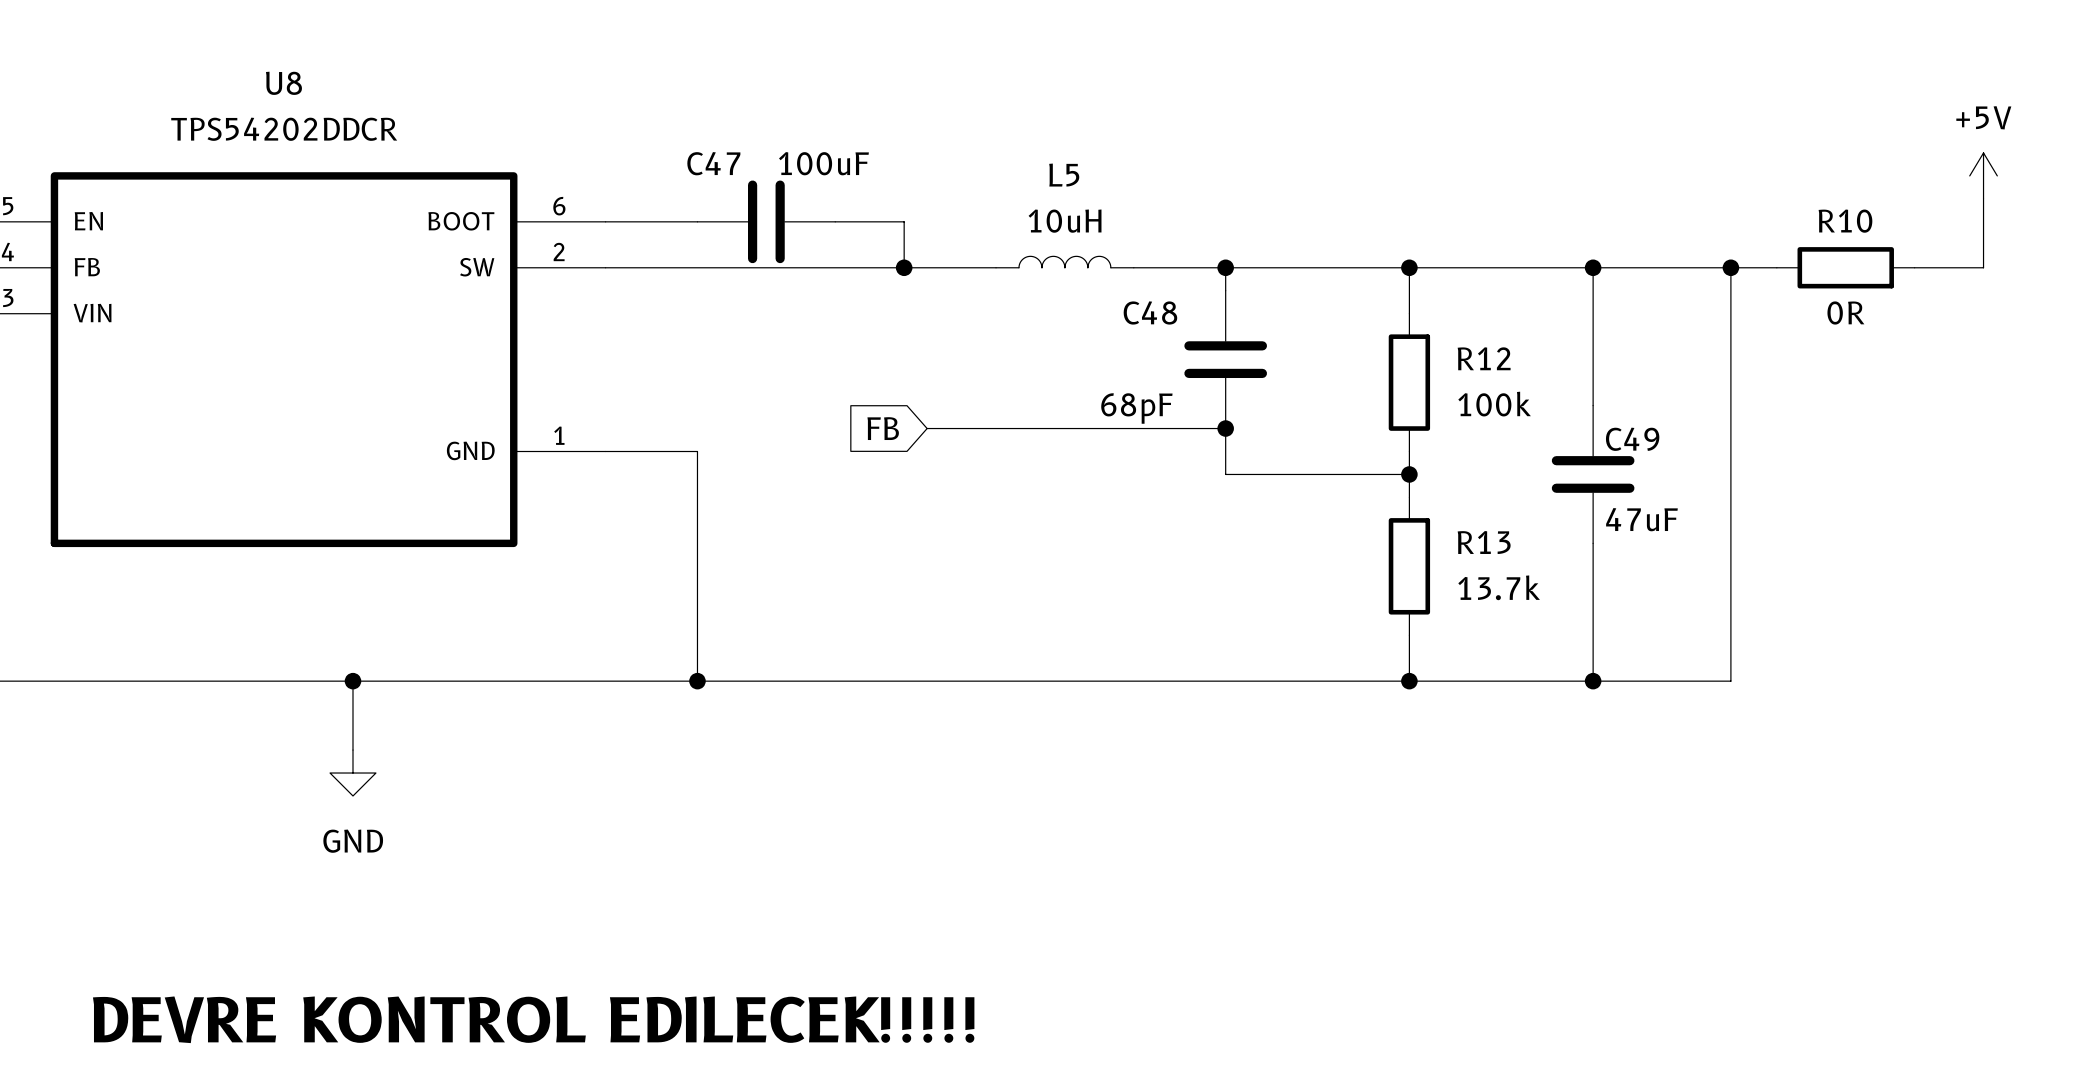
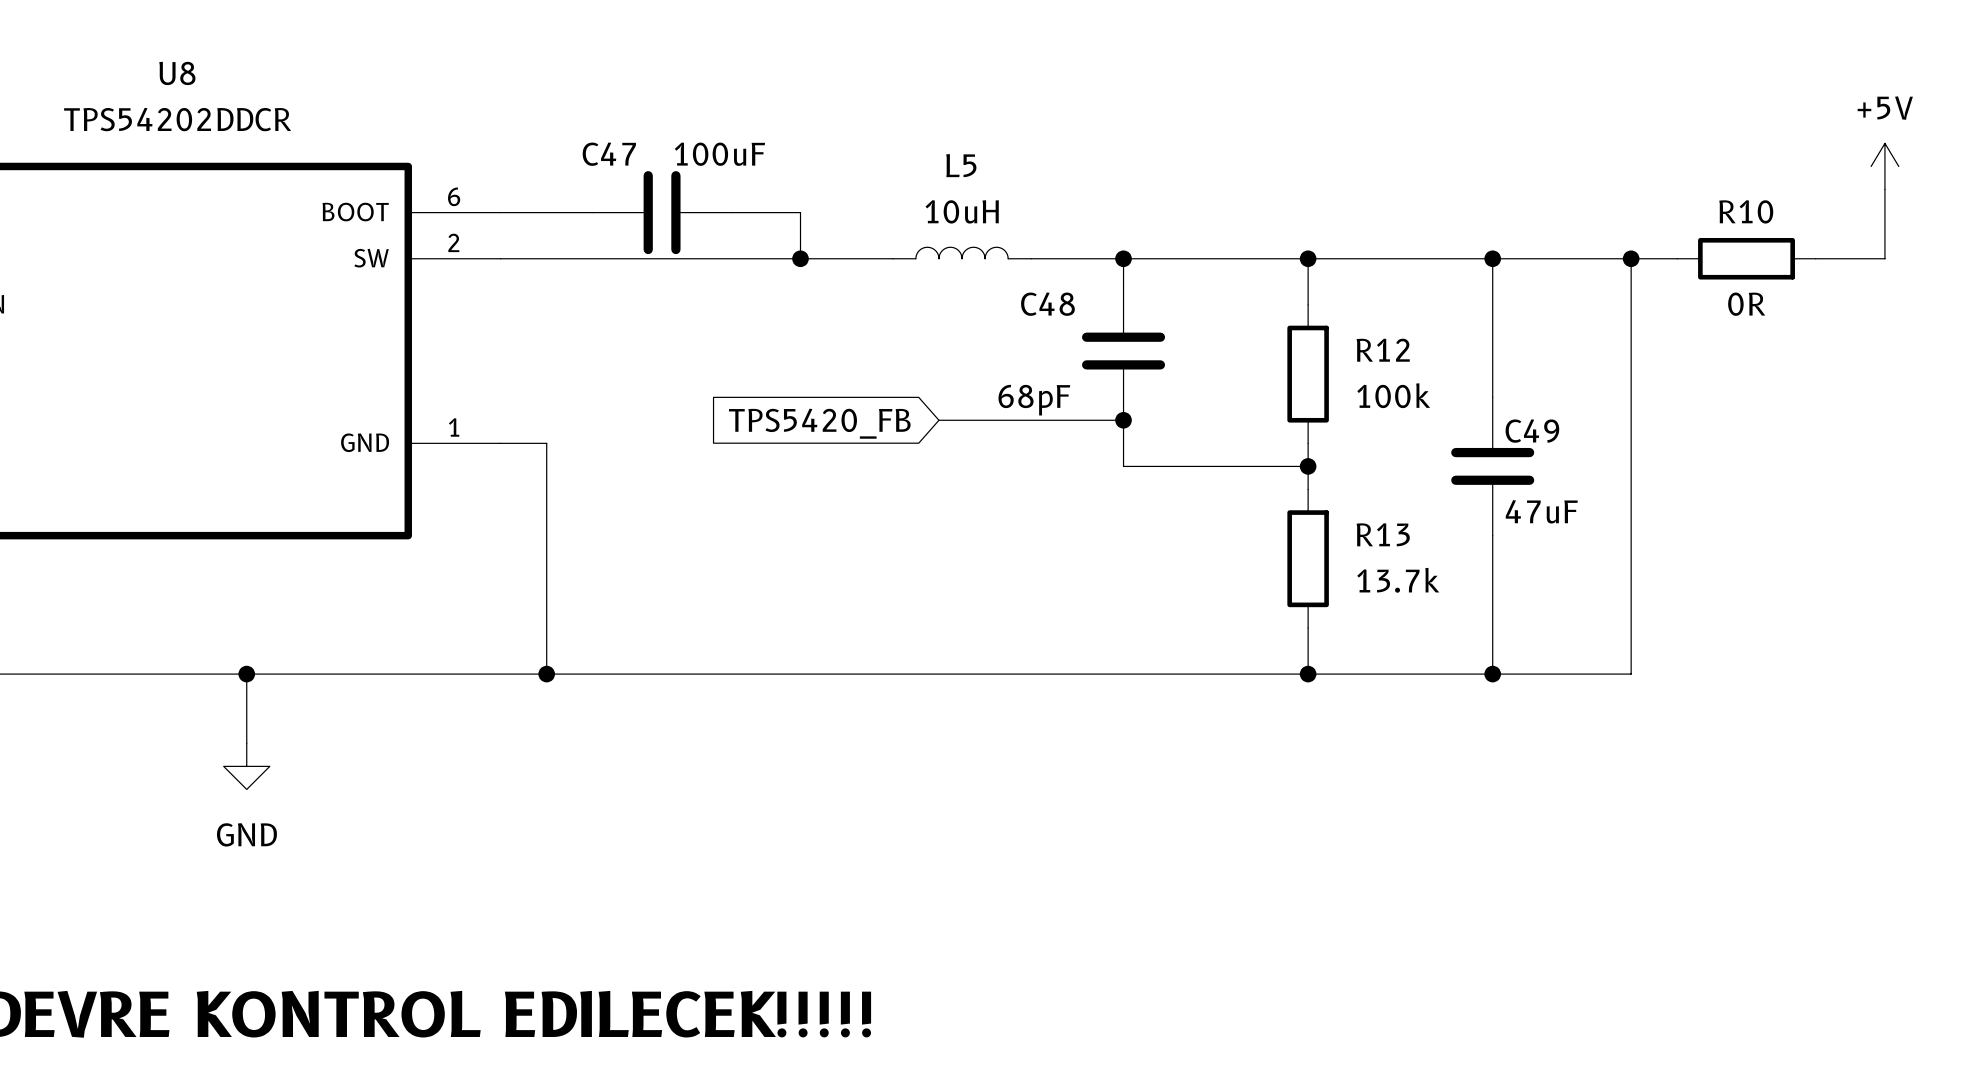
global label: FB (883, 428) -> none
wire: (927, 428) (1041, 428) -> none
global label: none -> TPS5420_FB (819, 423)
wire: (651, 451) (697, 451) (697, 681) -> (546, 443) (546, 674)
junction position: (697, 681) -> (546, 674)

